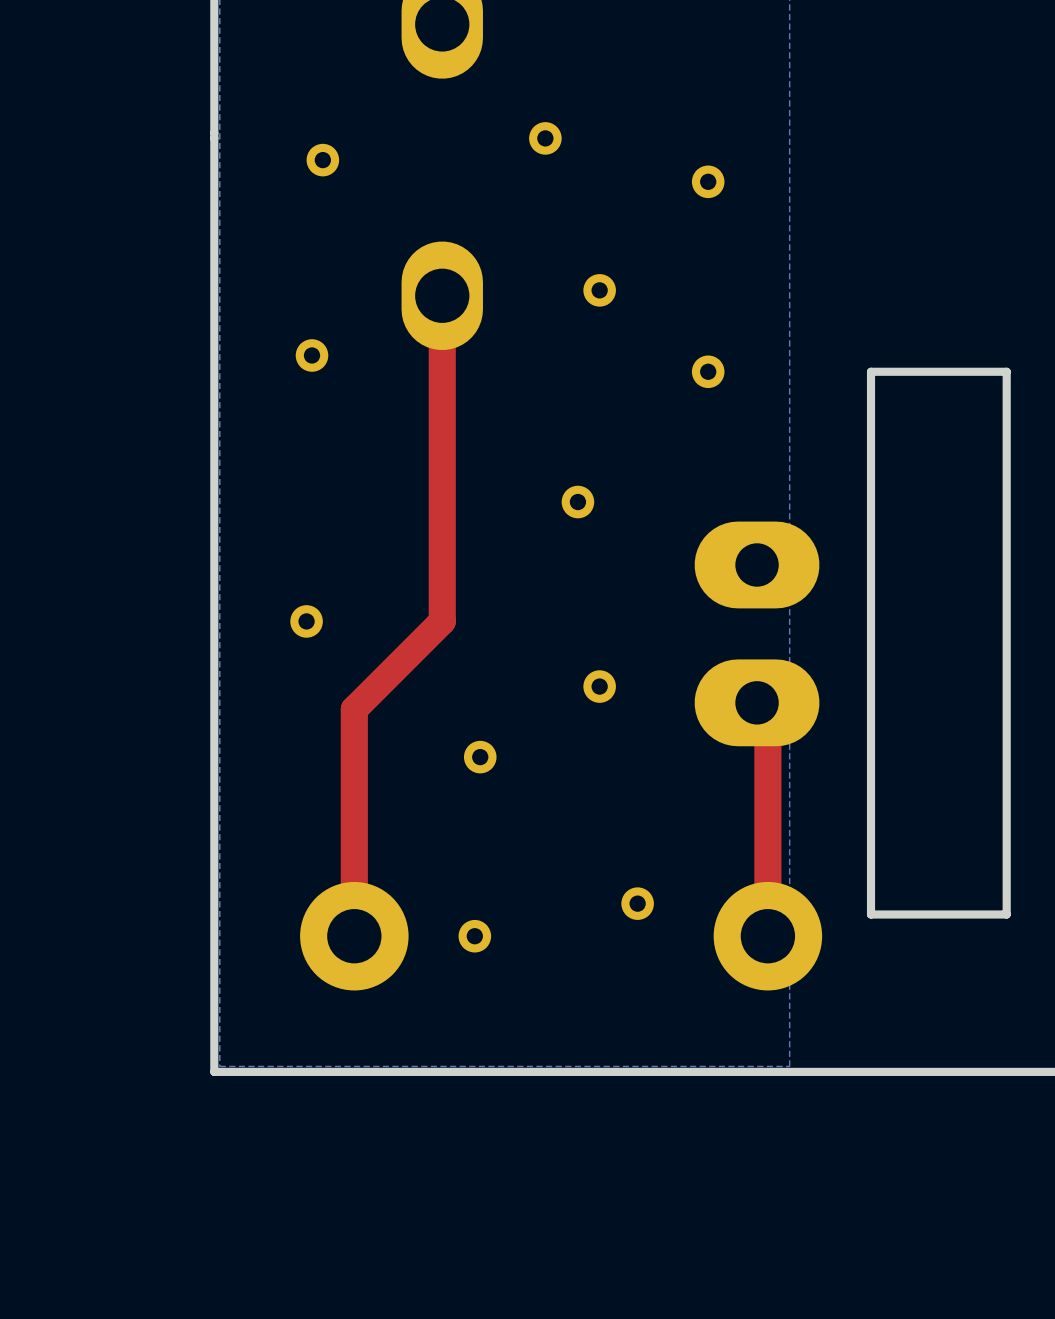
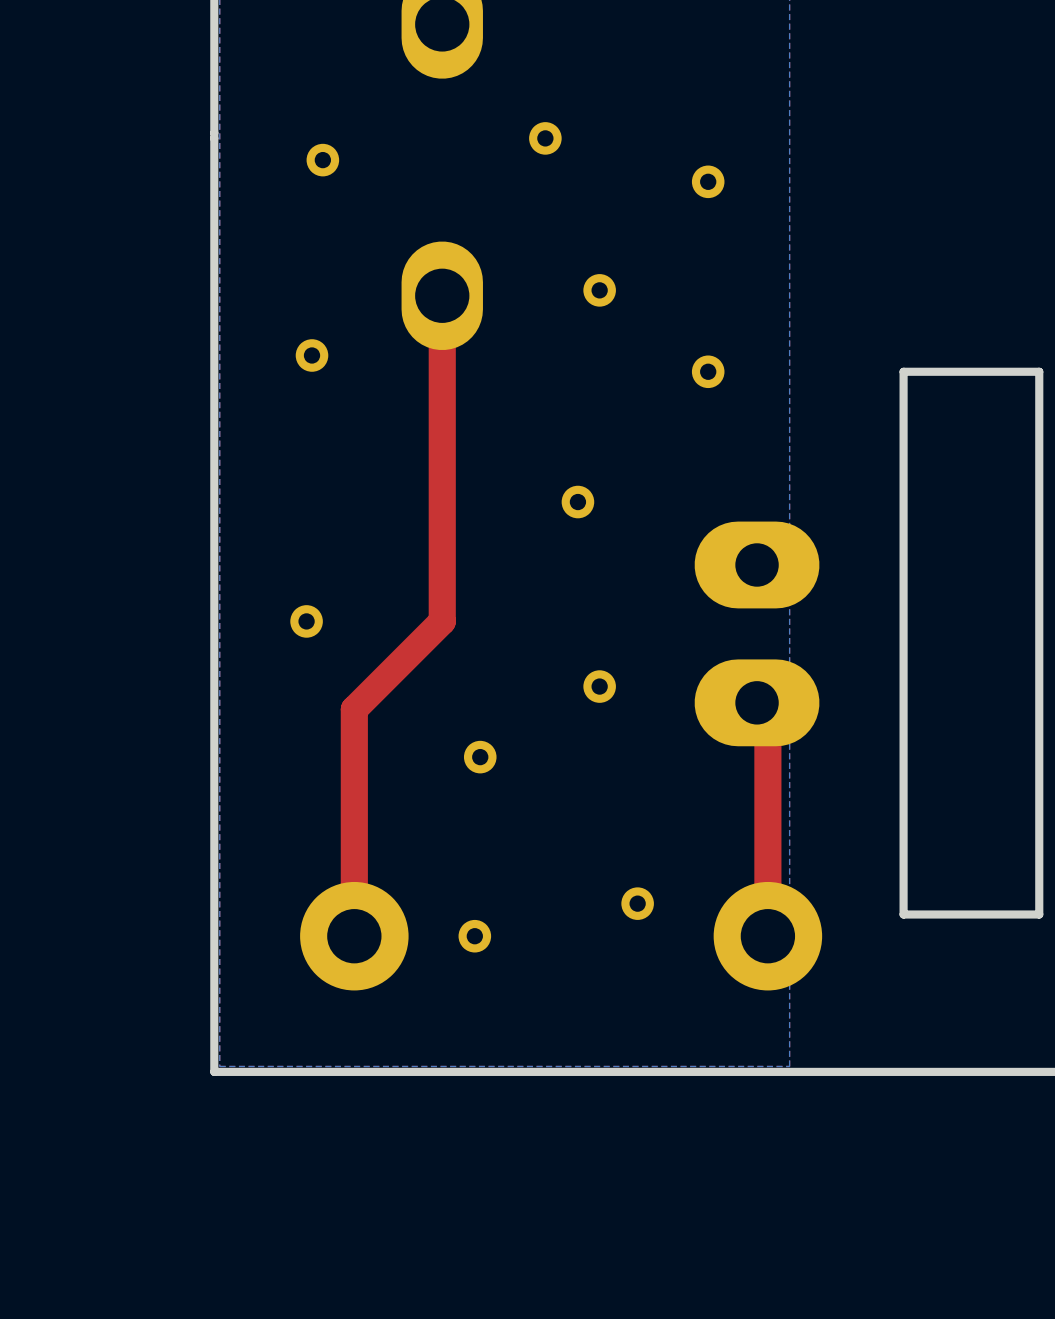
board edge: (903, 371) (871, 371) (871, 914) (903, 914) -> (903, 371) (903, 914)
board edge: (1006, 371) (1006, 914) -> (1006, 371) (1039, 371) (1039, 914) (1006, 914)

